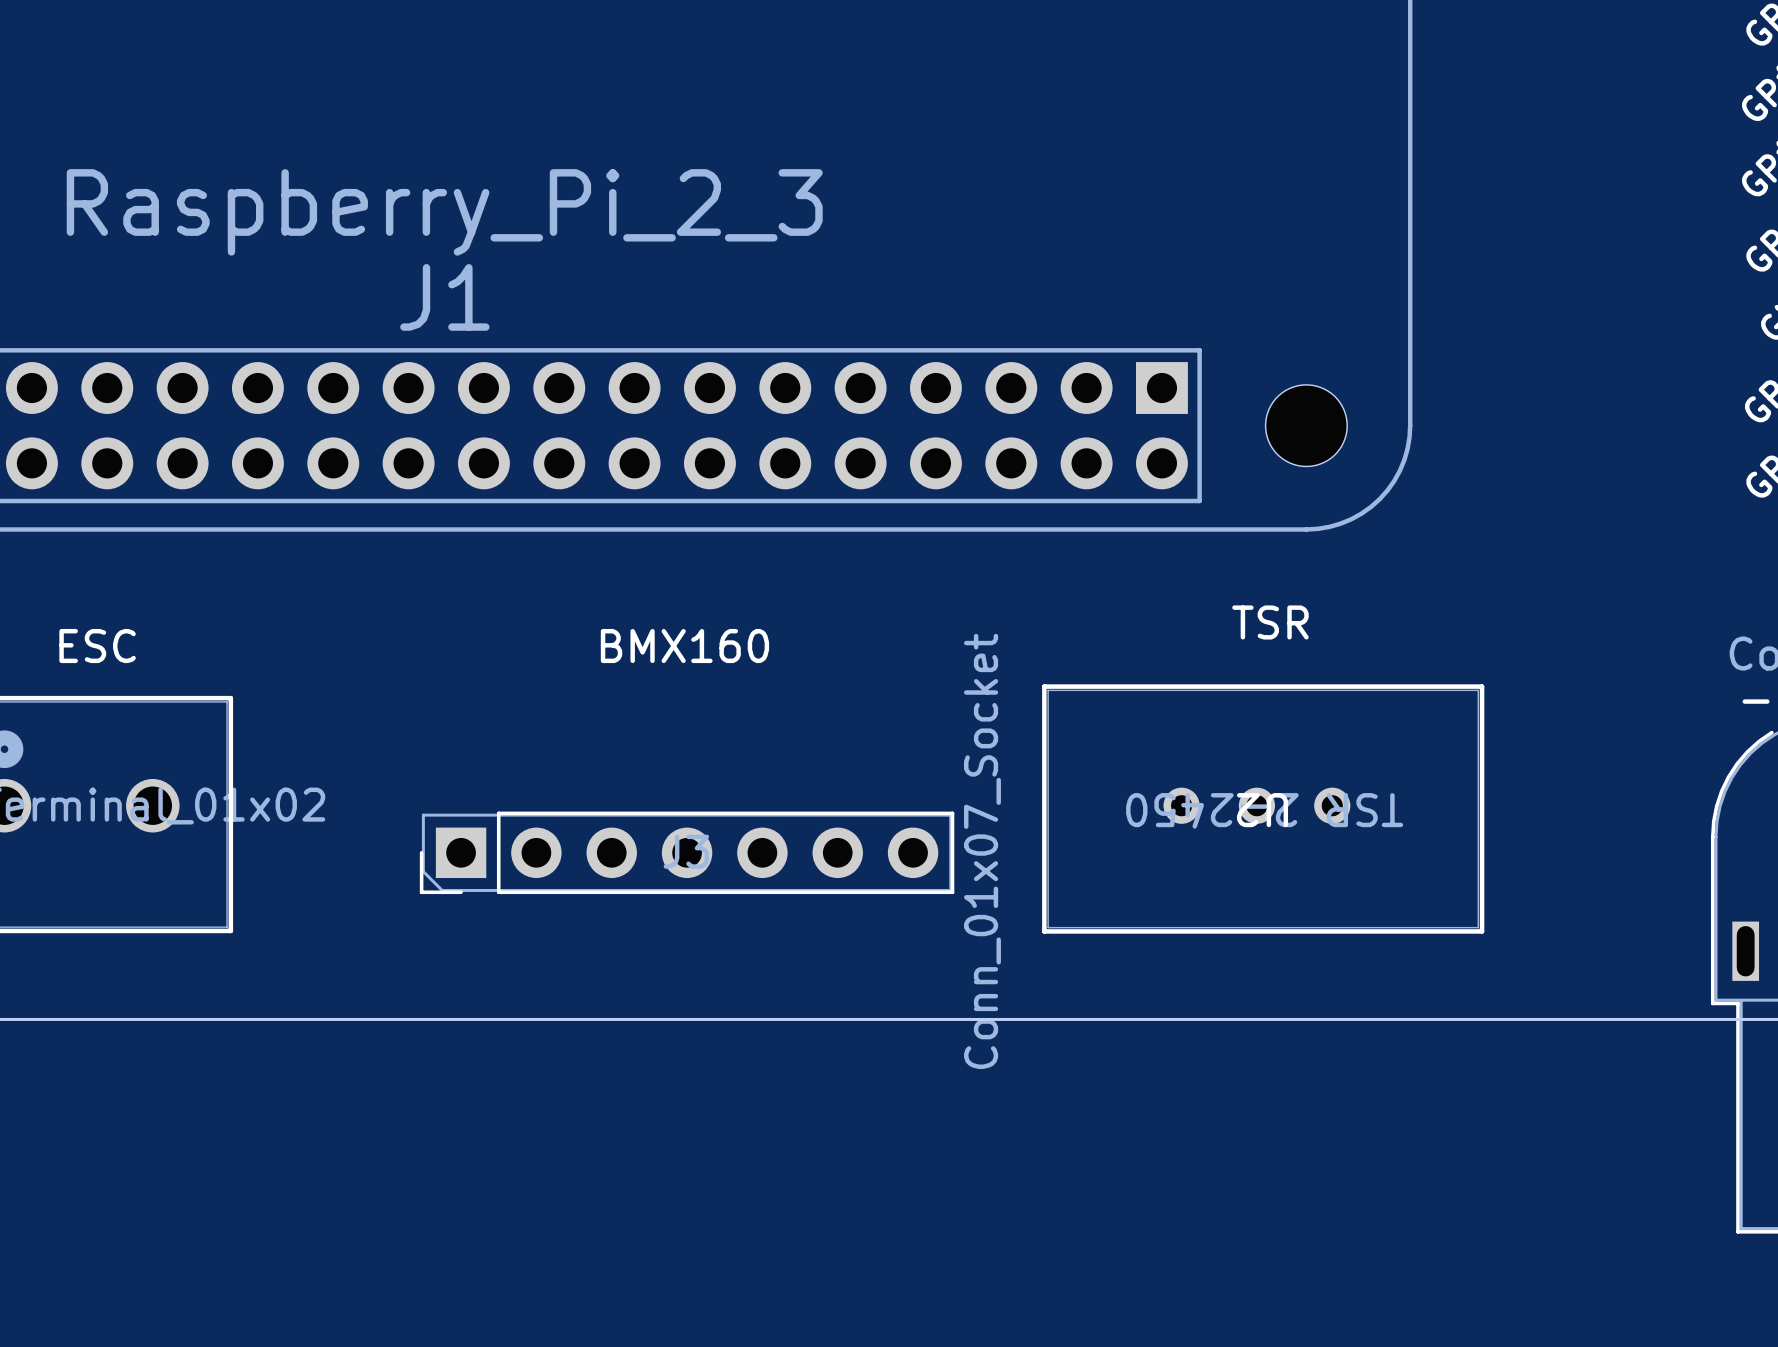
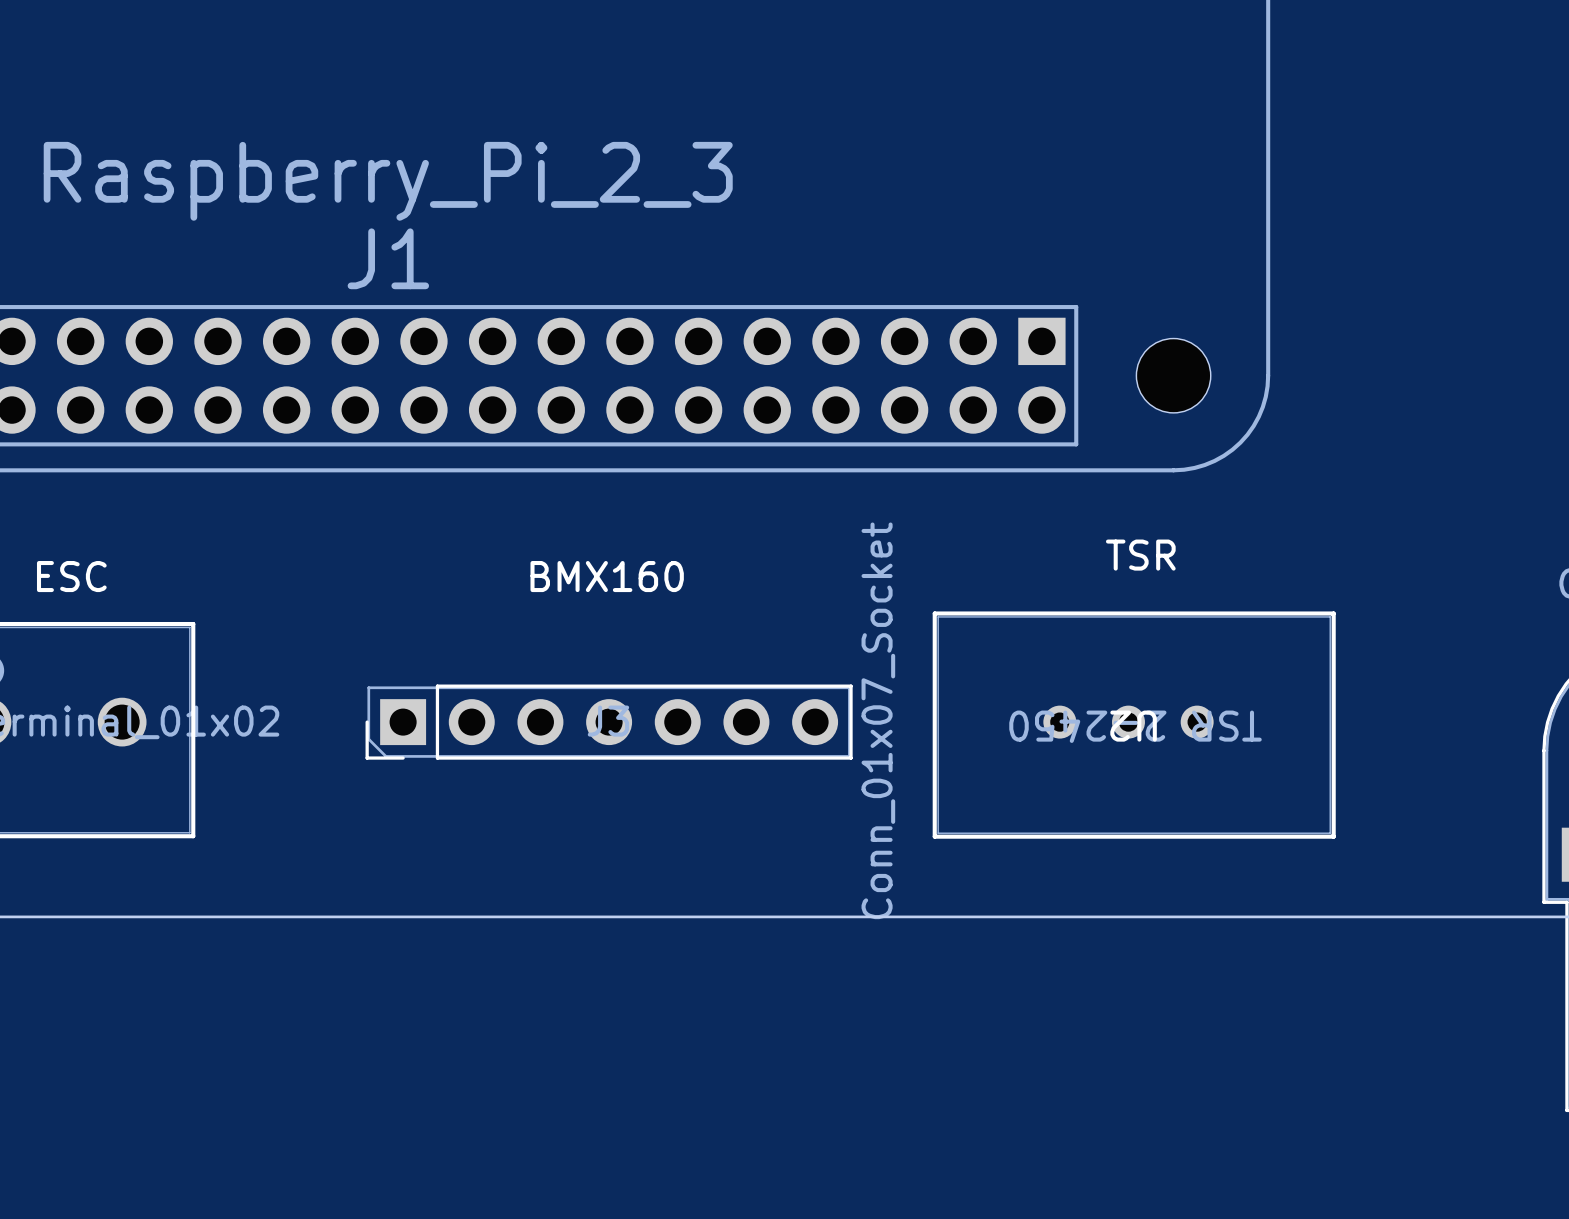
part position: (687, 852) -> (609, 722)

